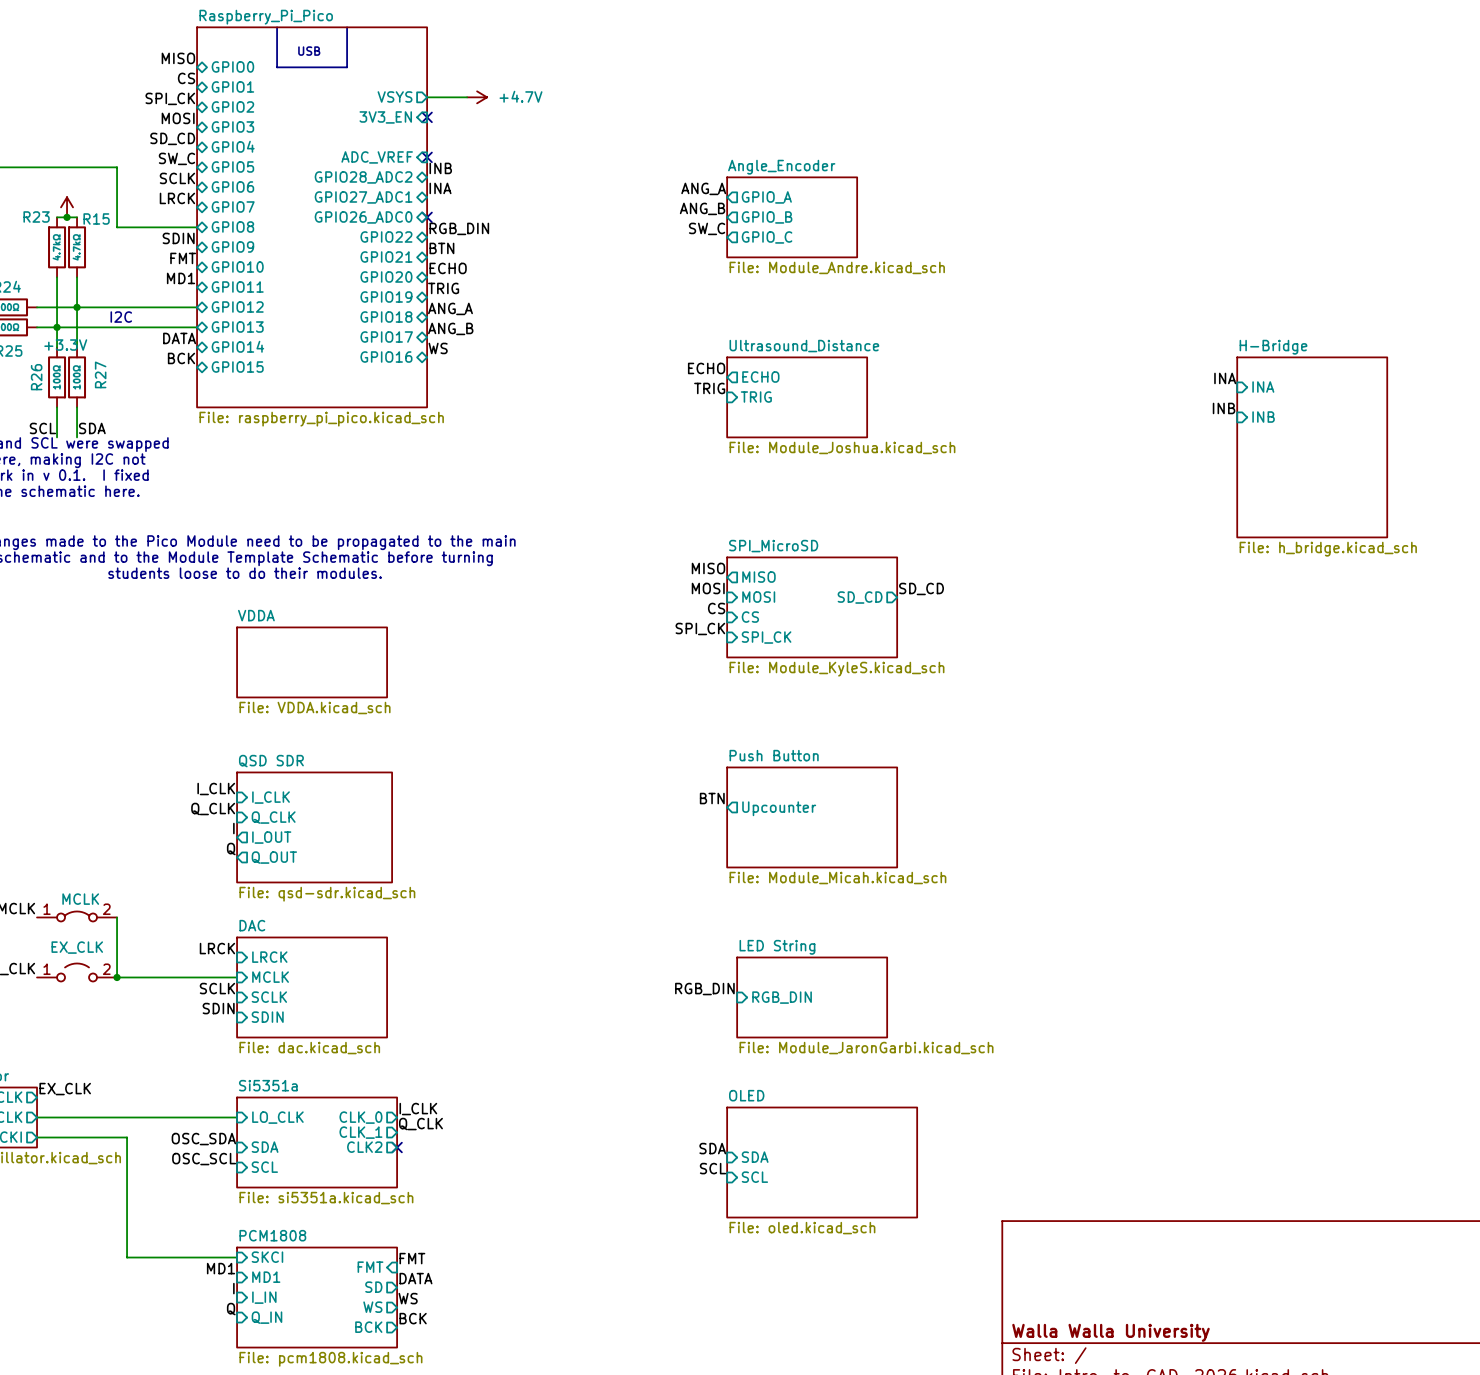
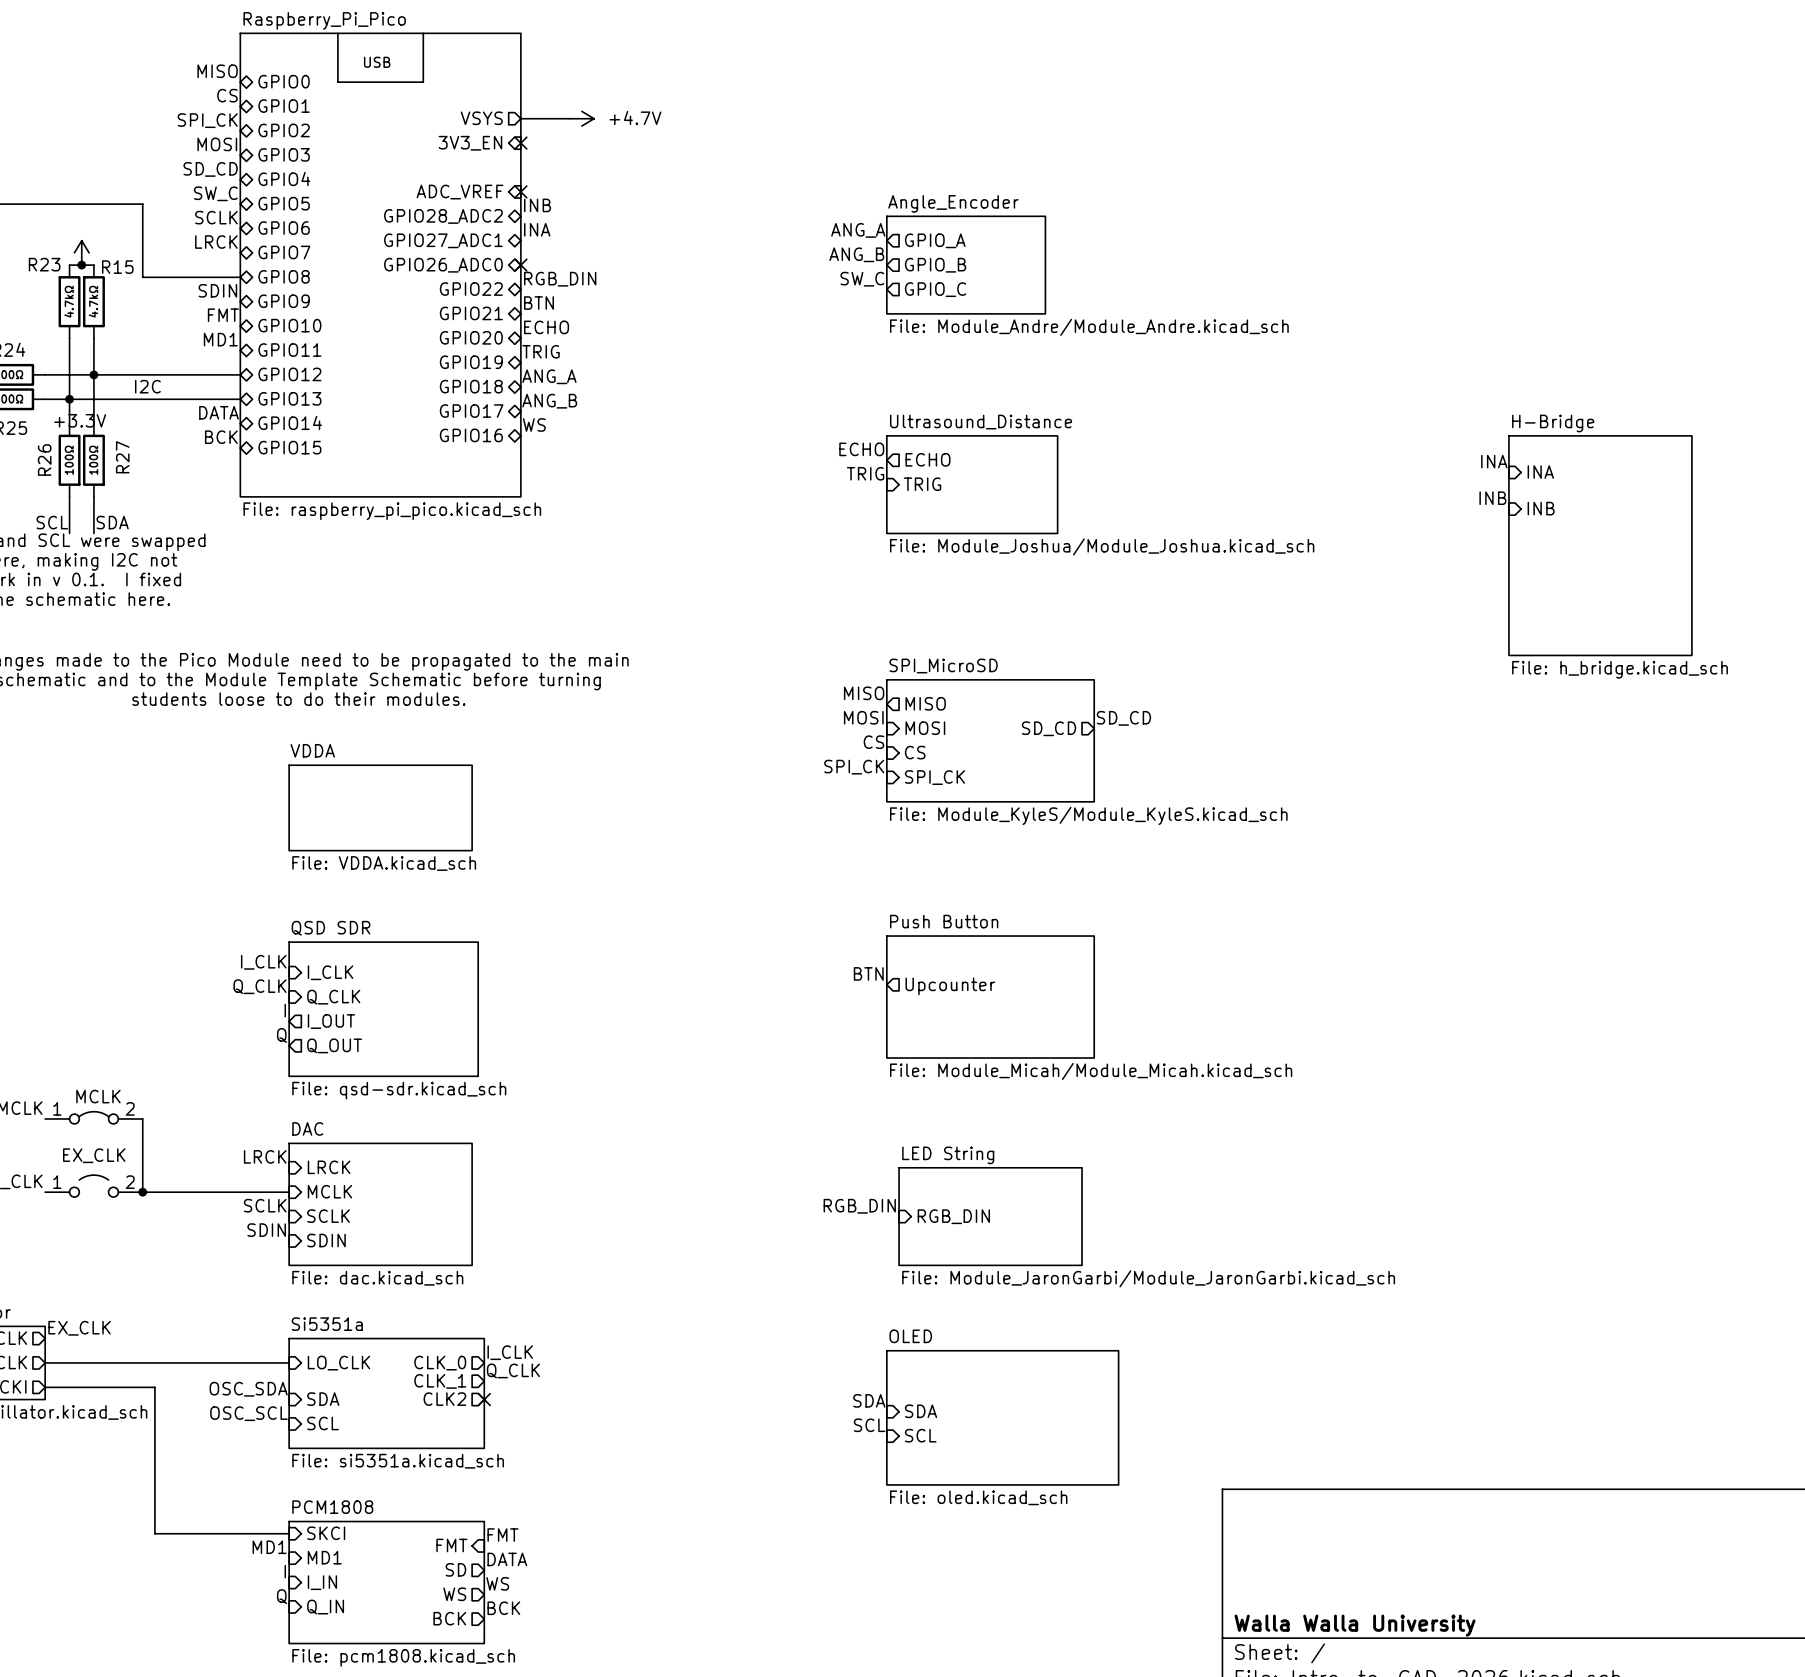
sheet Angle_Encoder value: File: Module_Andre.kicad_sch (837, 267) -> File: Module_Andre/Module_Andre.kicad_sch (1089, 327)
sheet Ultrasound_Distance value: File: Module_Joshua.kicad_sch (842, 447) -> File: Module_Joshua/Module_Joshua.kicad_sch (1102, 546)
sheet SPI_MicroSD value: File: Module_KyleS.kicad_sch (836, 669) -> File: Module_KyleS/Module_KyleS.kicad_sch (1088, 815)
sheet Push Button value: File: Module_Micah.kicad_sch (837, 878) -> File: Module_Micah/Module_Micah.kicad_sch (1091, 1071)
sheet LED String value: File: Module_JaronGarbi.kicad_sch (866, 1048) -> File: Module_JaronGarbi/Module_JaronGarbi.kicad_sch (1148, 1278)

